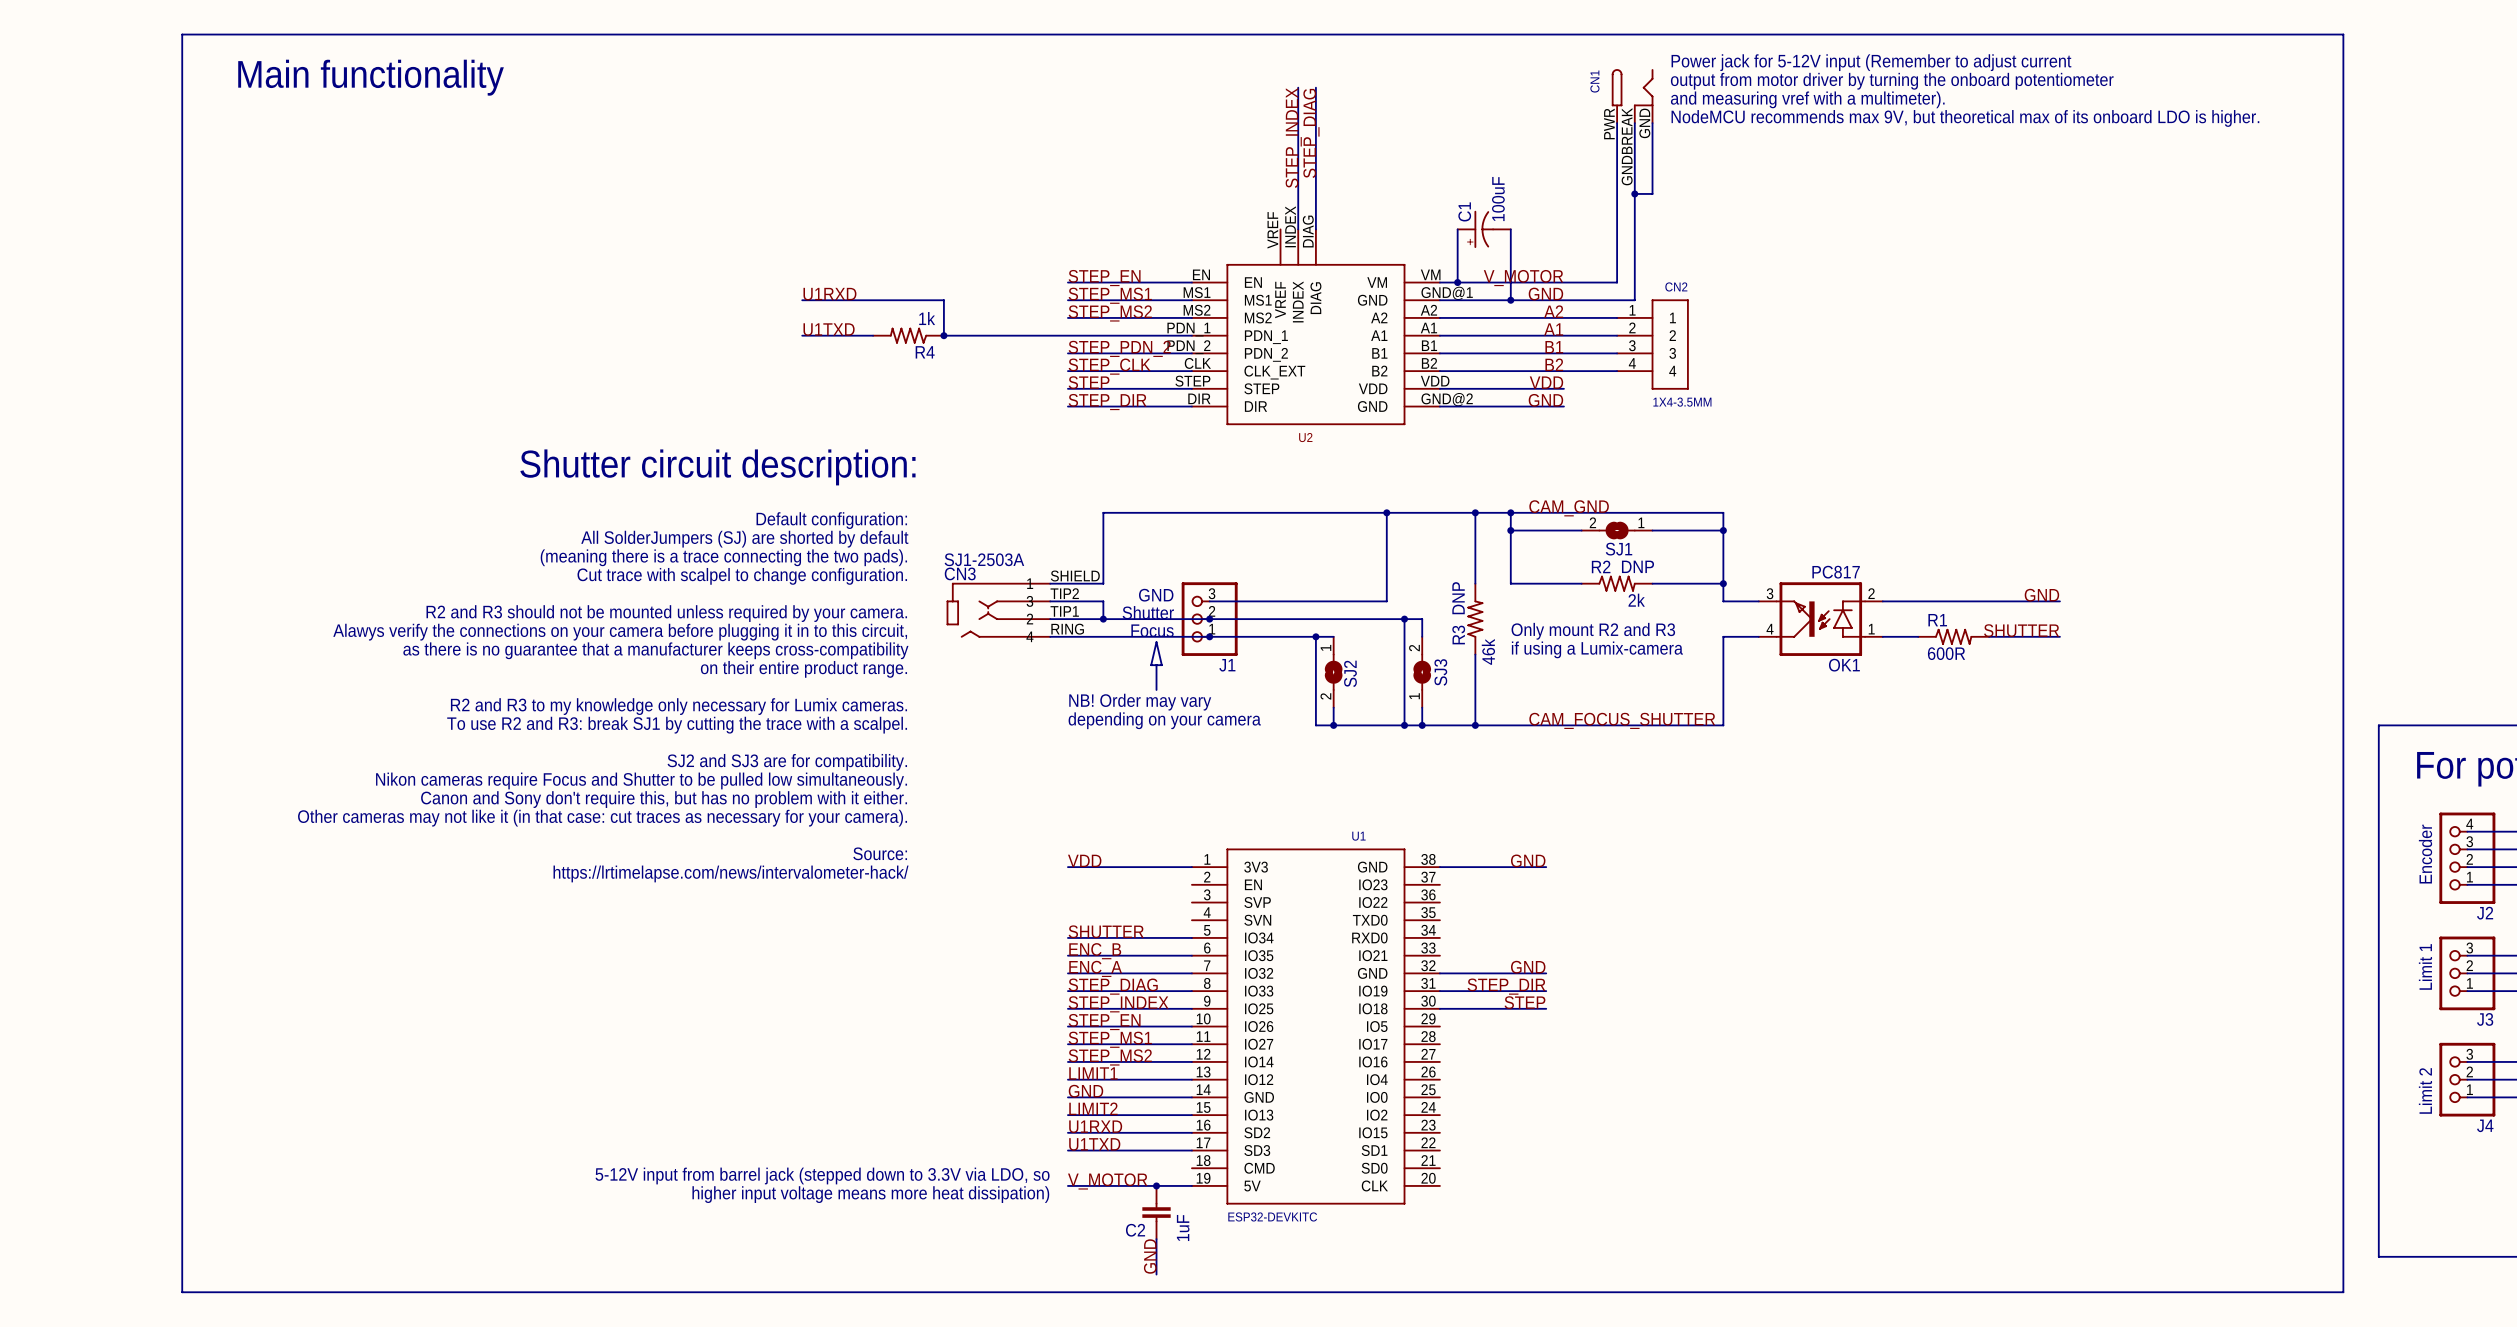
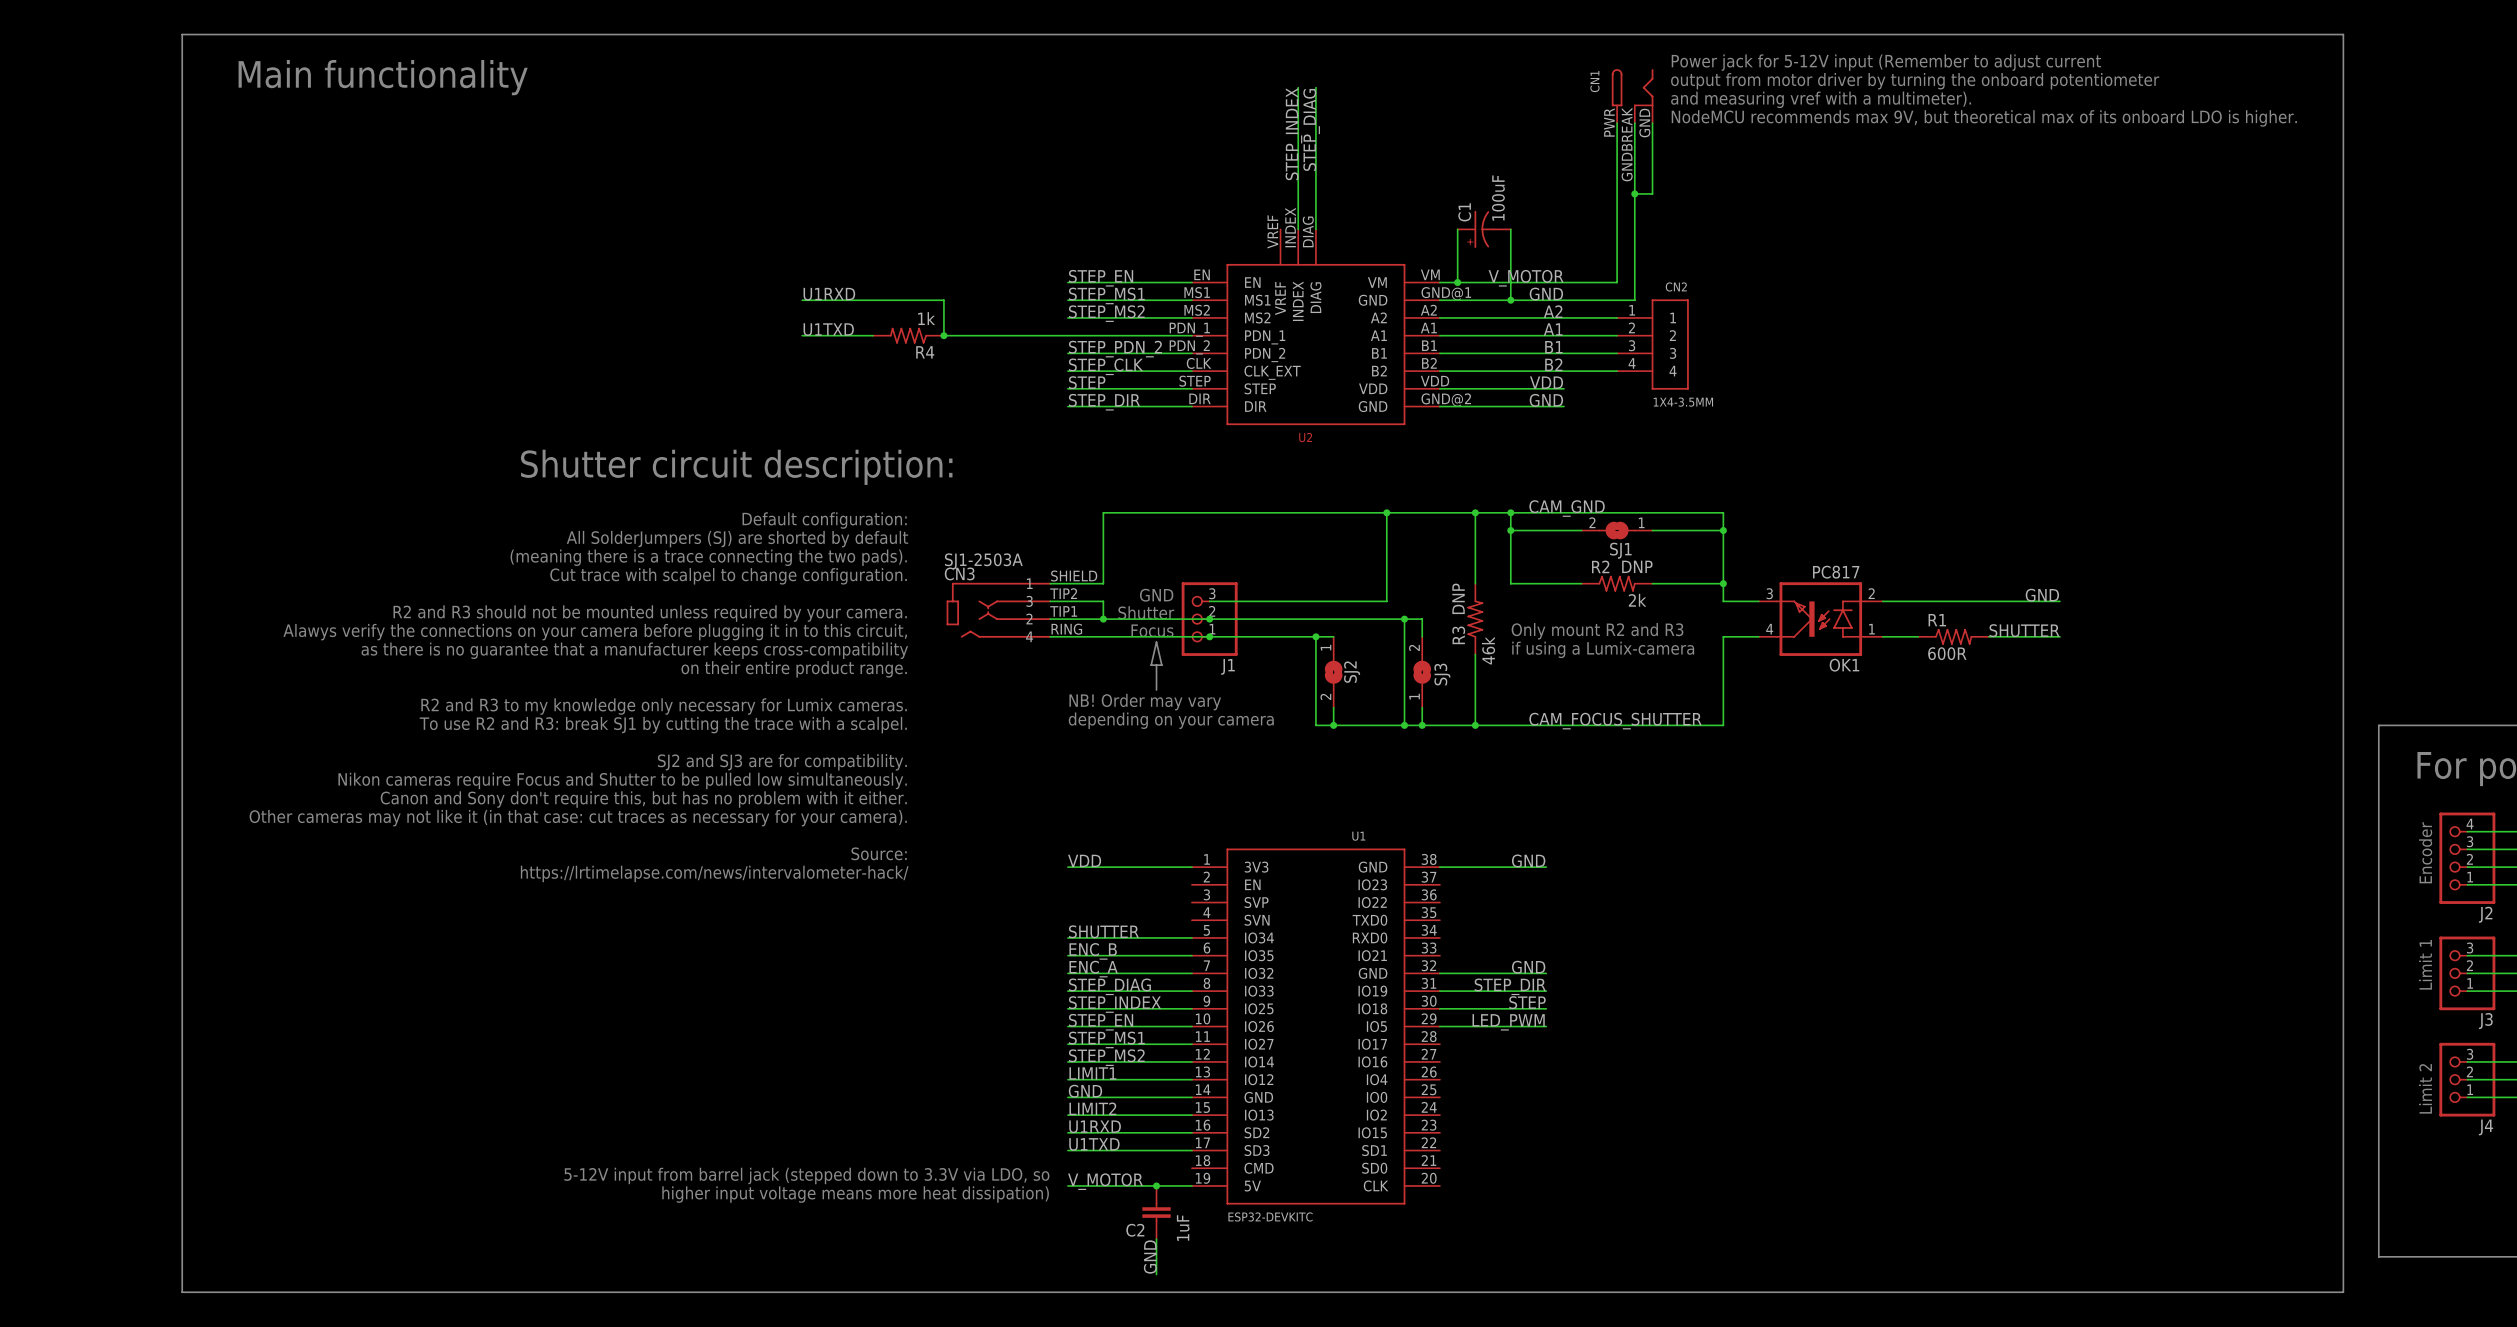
label: none -> LED_PWM (1508, 1022)
wire: none -> (1439, 1026) (1546, 1026)

